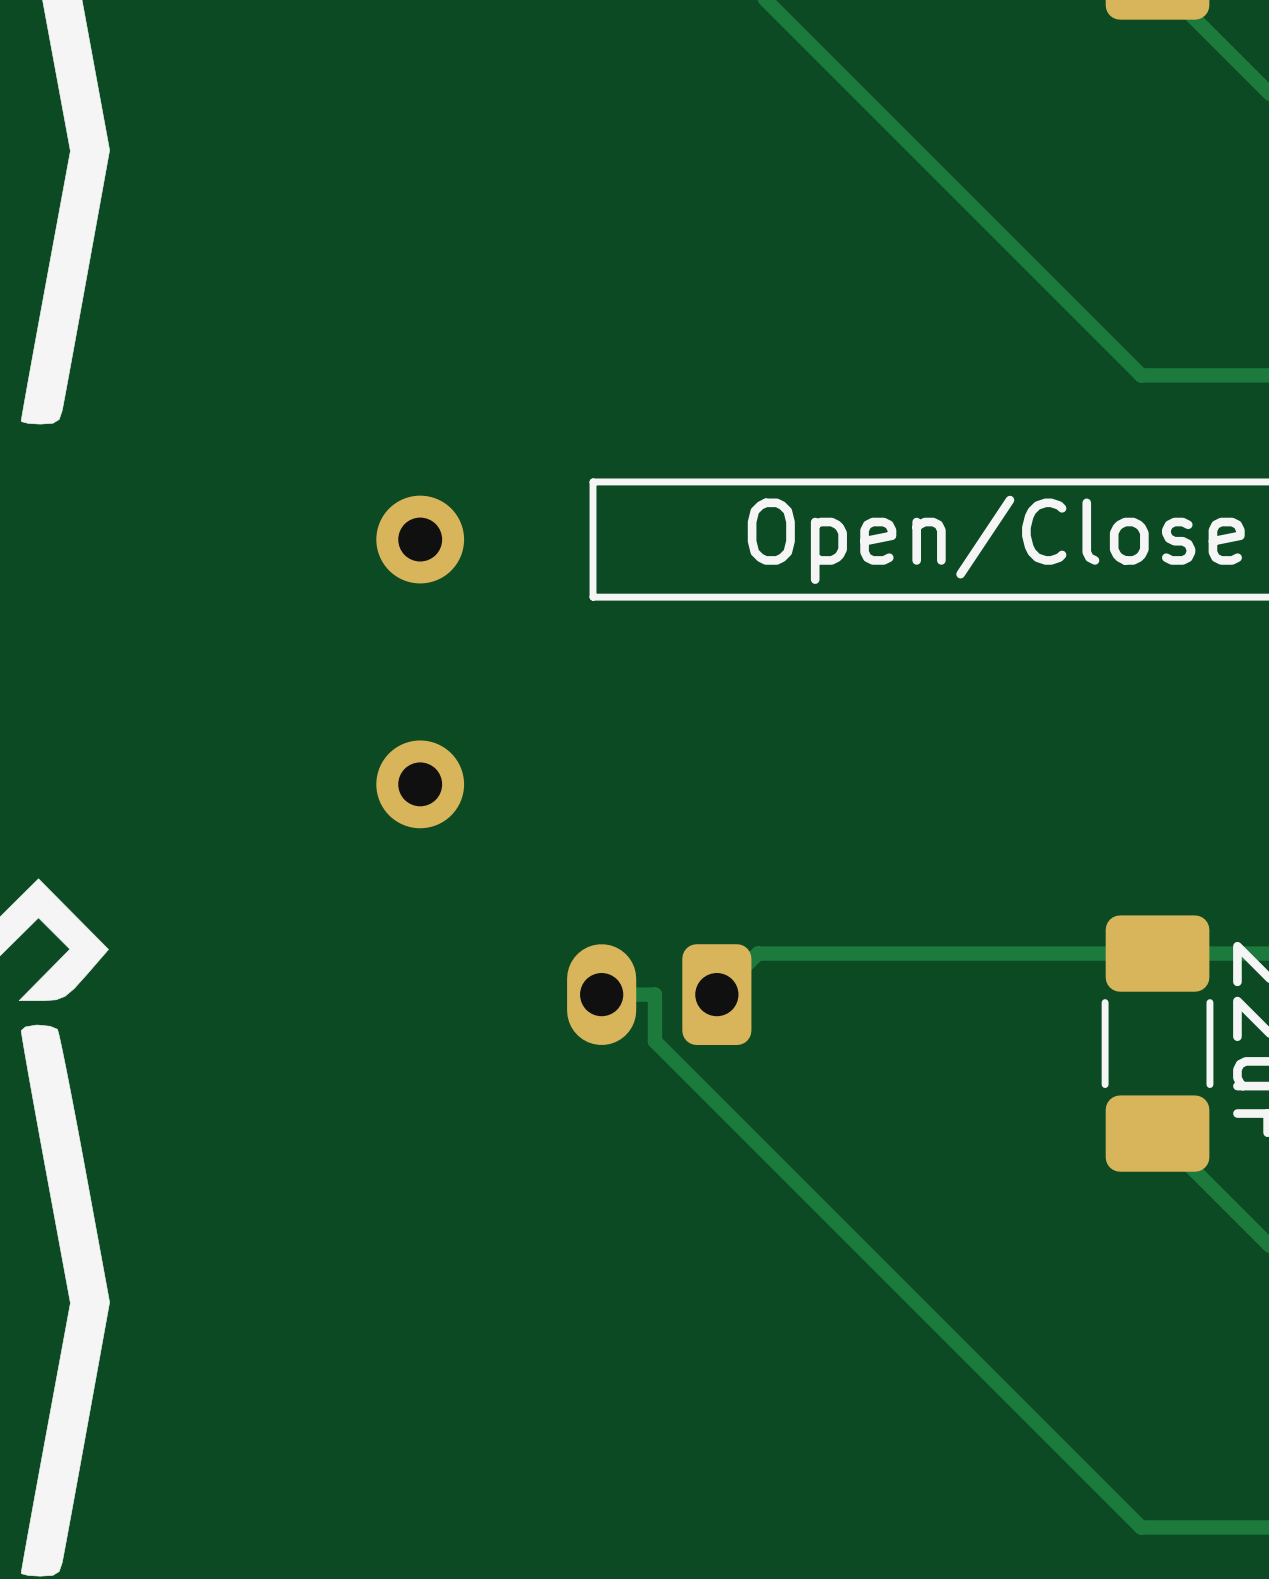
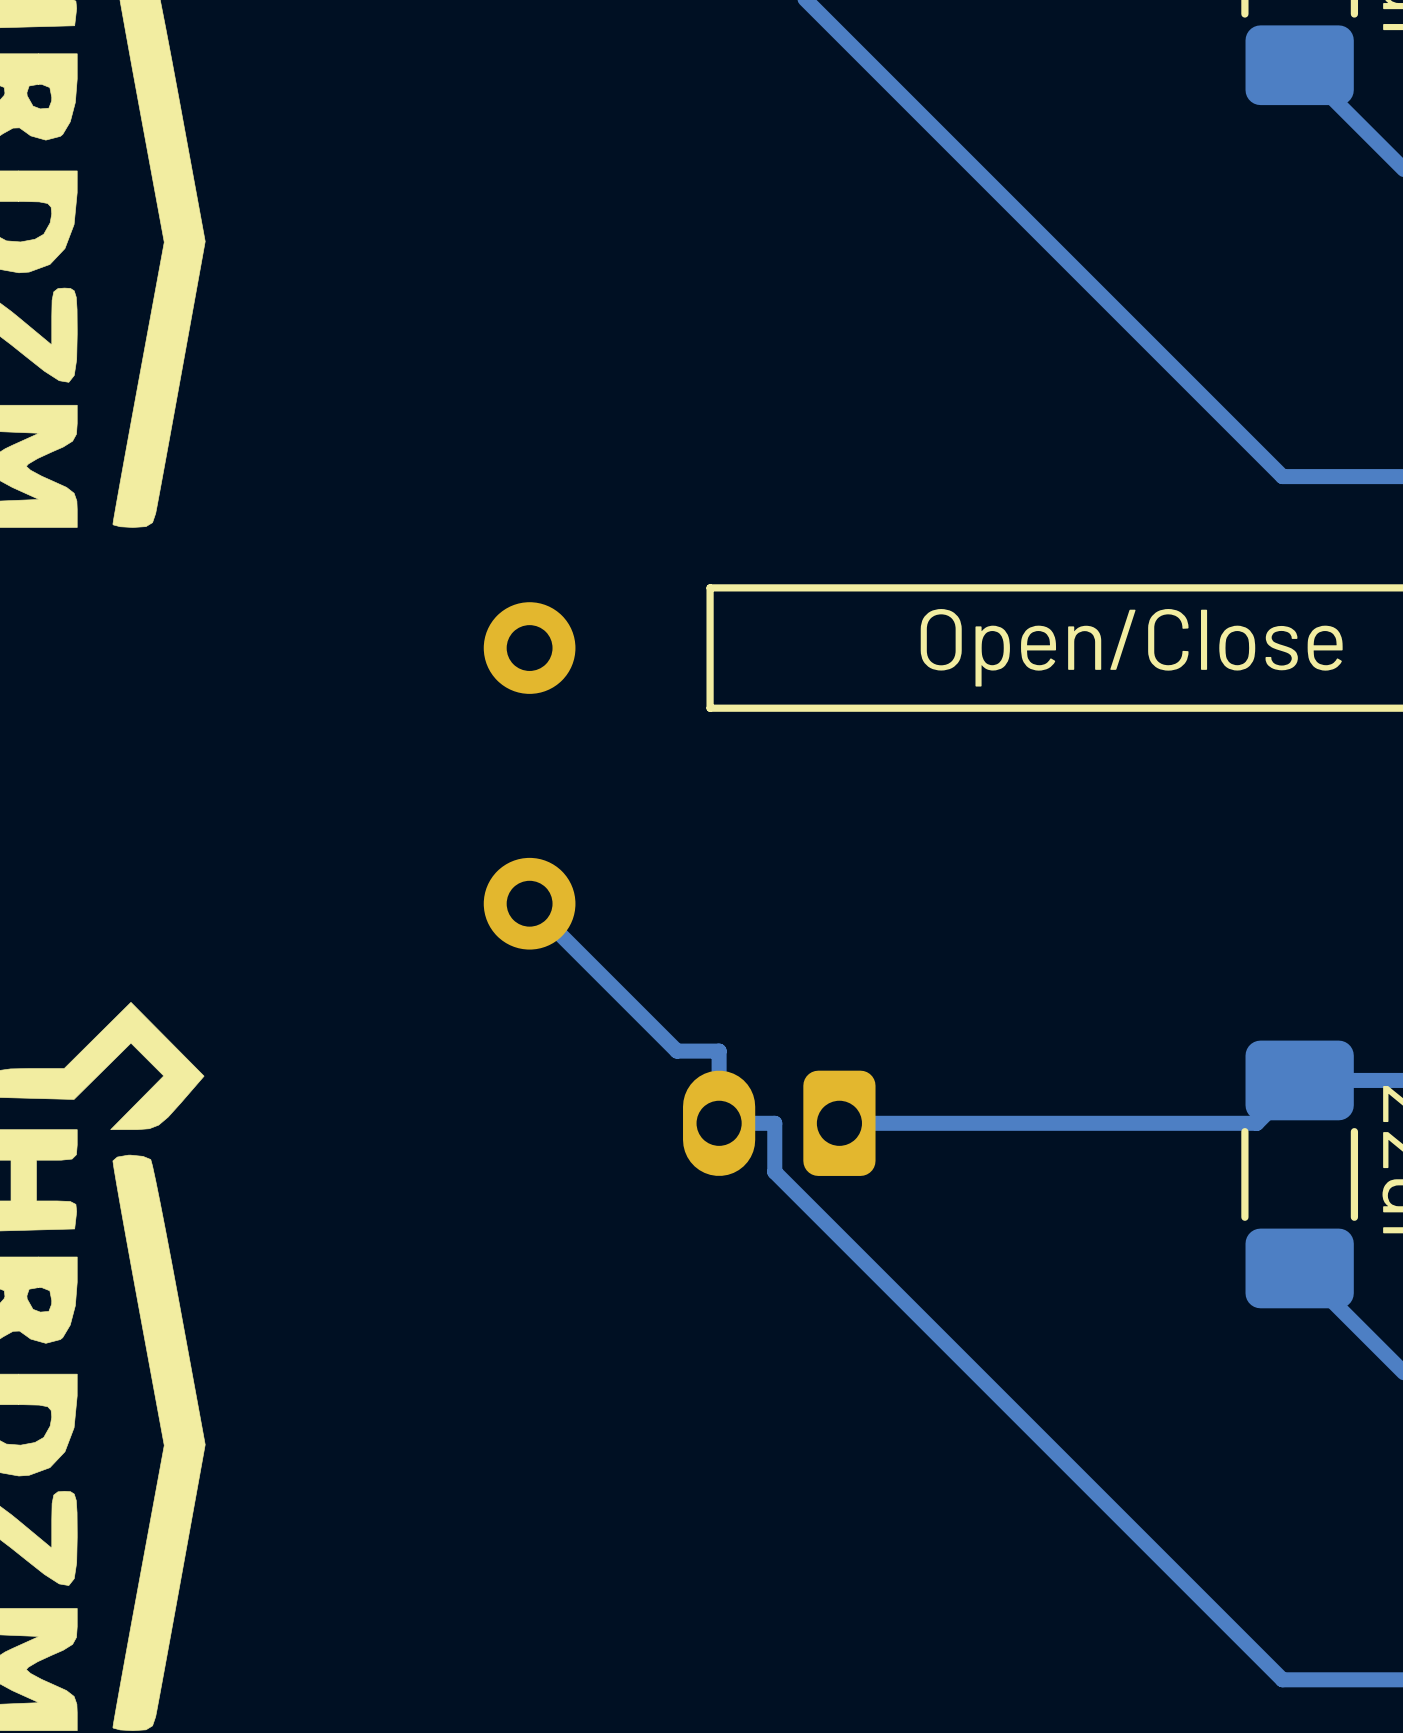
track: none -> (529, 903) (676, 1051) (719, 1051) (719, 1123)
track: (1157, 953) (757, 953) (716, 994) -> (1299, 1080) (1256, 1123) (839, 1123)

